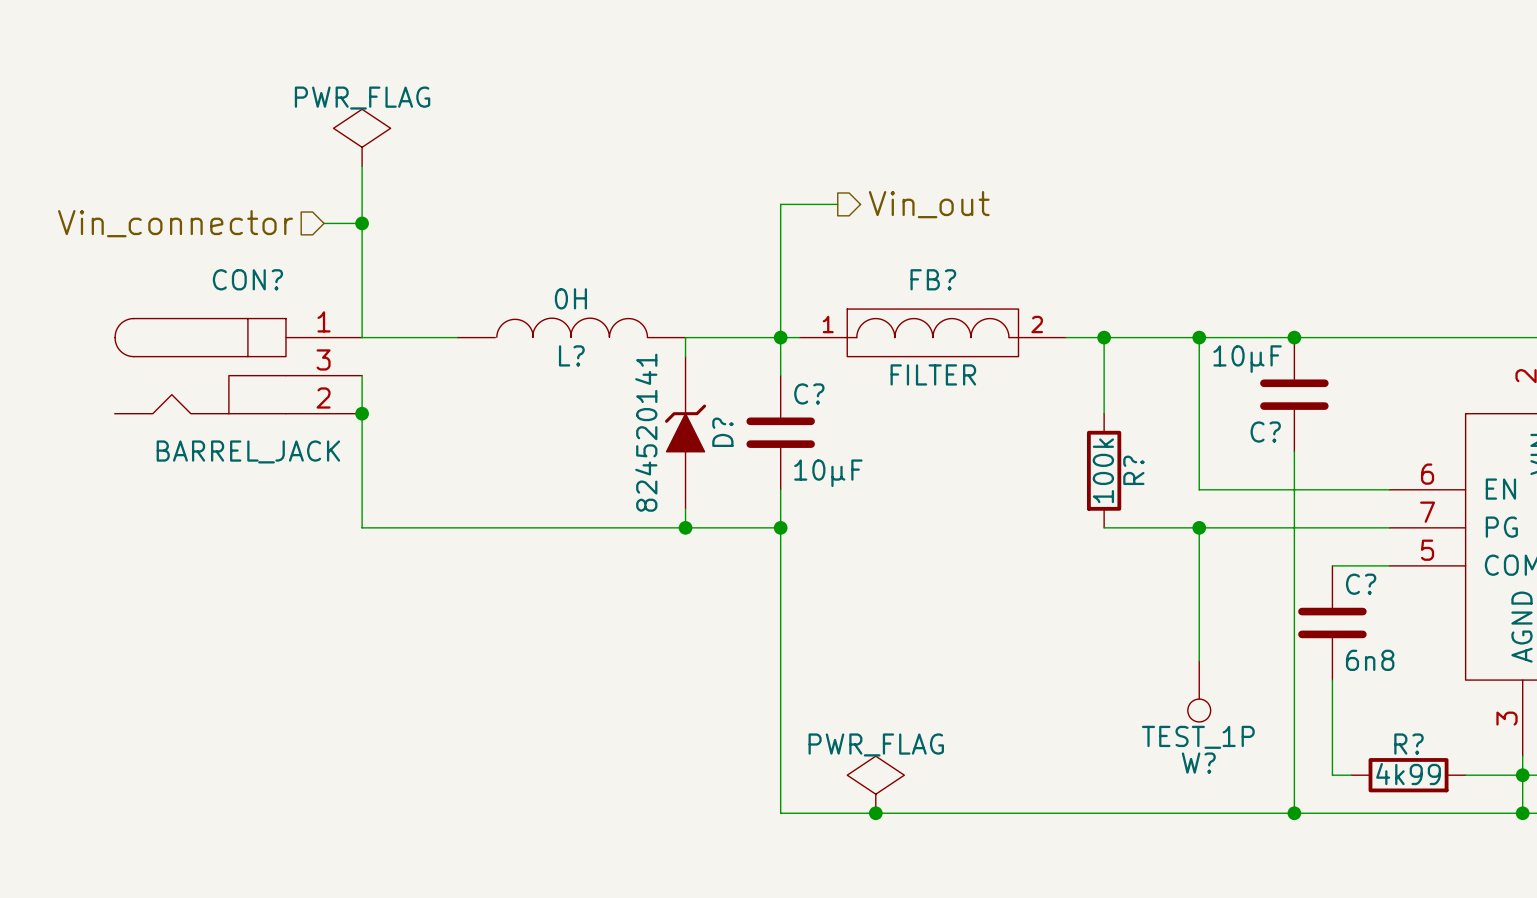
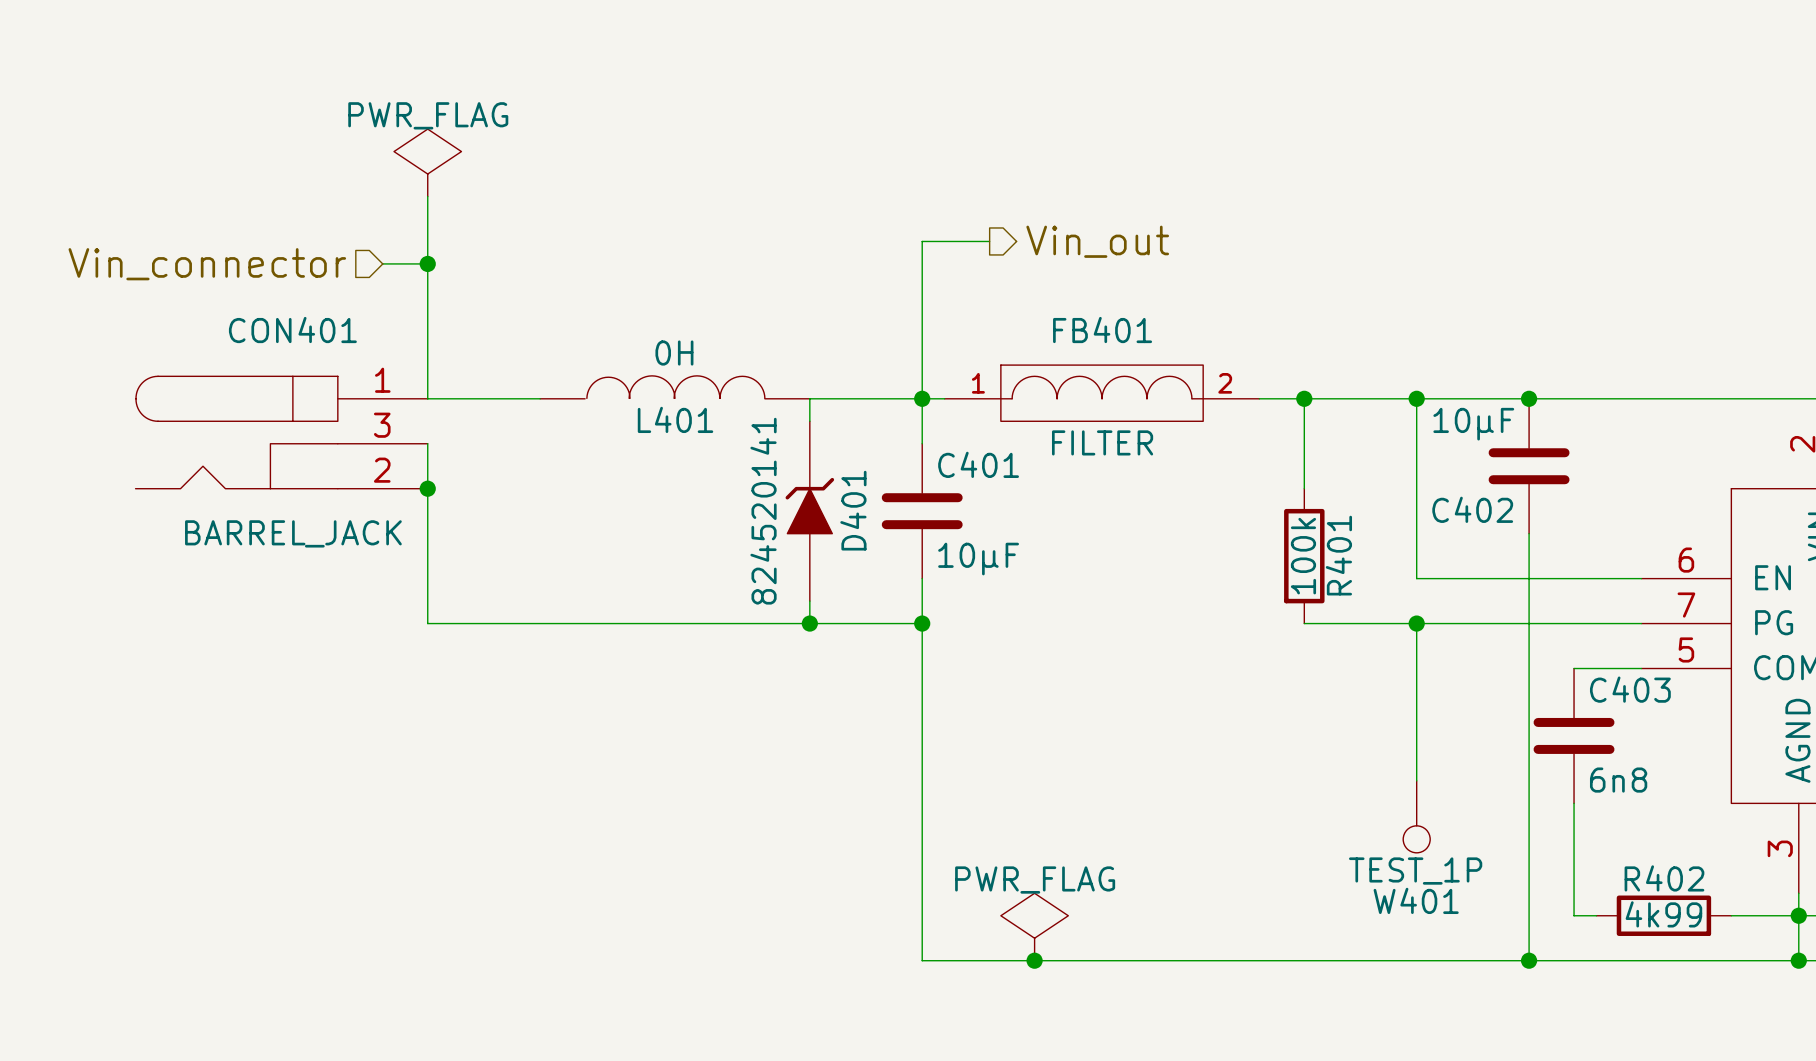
CON? name: CON? (247, 279) -> CON401 (292, 330)
FB? name: FB? (933, 279) -> FB401 (1102, 330)
L? name: L? (571, 355) -> L401 (675, 419)
C? name: C? (809, 393) -> C401 (978, 464)
D? name: D? (722, 432) -> D401 (853, 510)
C? name: C? (1265, 432) -> C402 (1472, 509)
R? name: R? (1133, 470) -> R401 (1338, 555)
C? name: C? (1361, 584) -> C403 (1630, 689)
R? name: R? (1408, 744) -> R402 (1664, 878)
W? name: W? (1198, 763) -> W401 (1416, 900)

